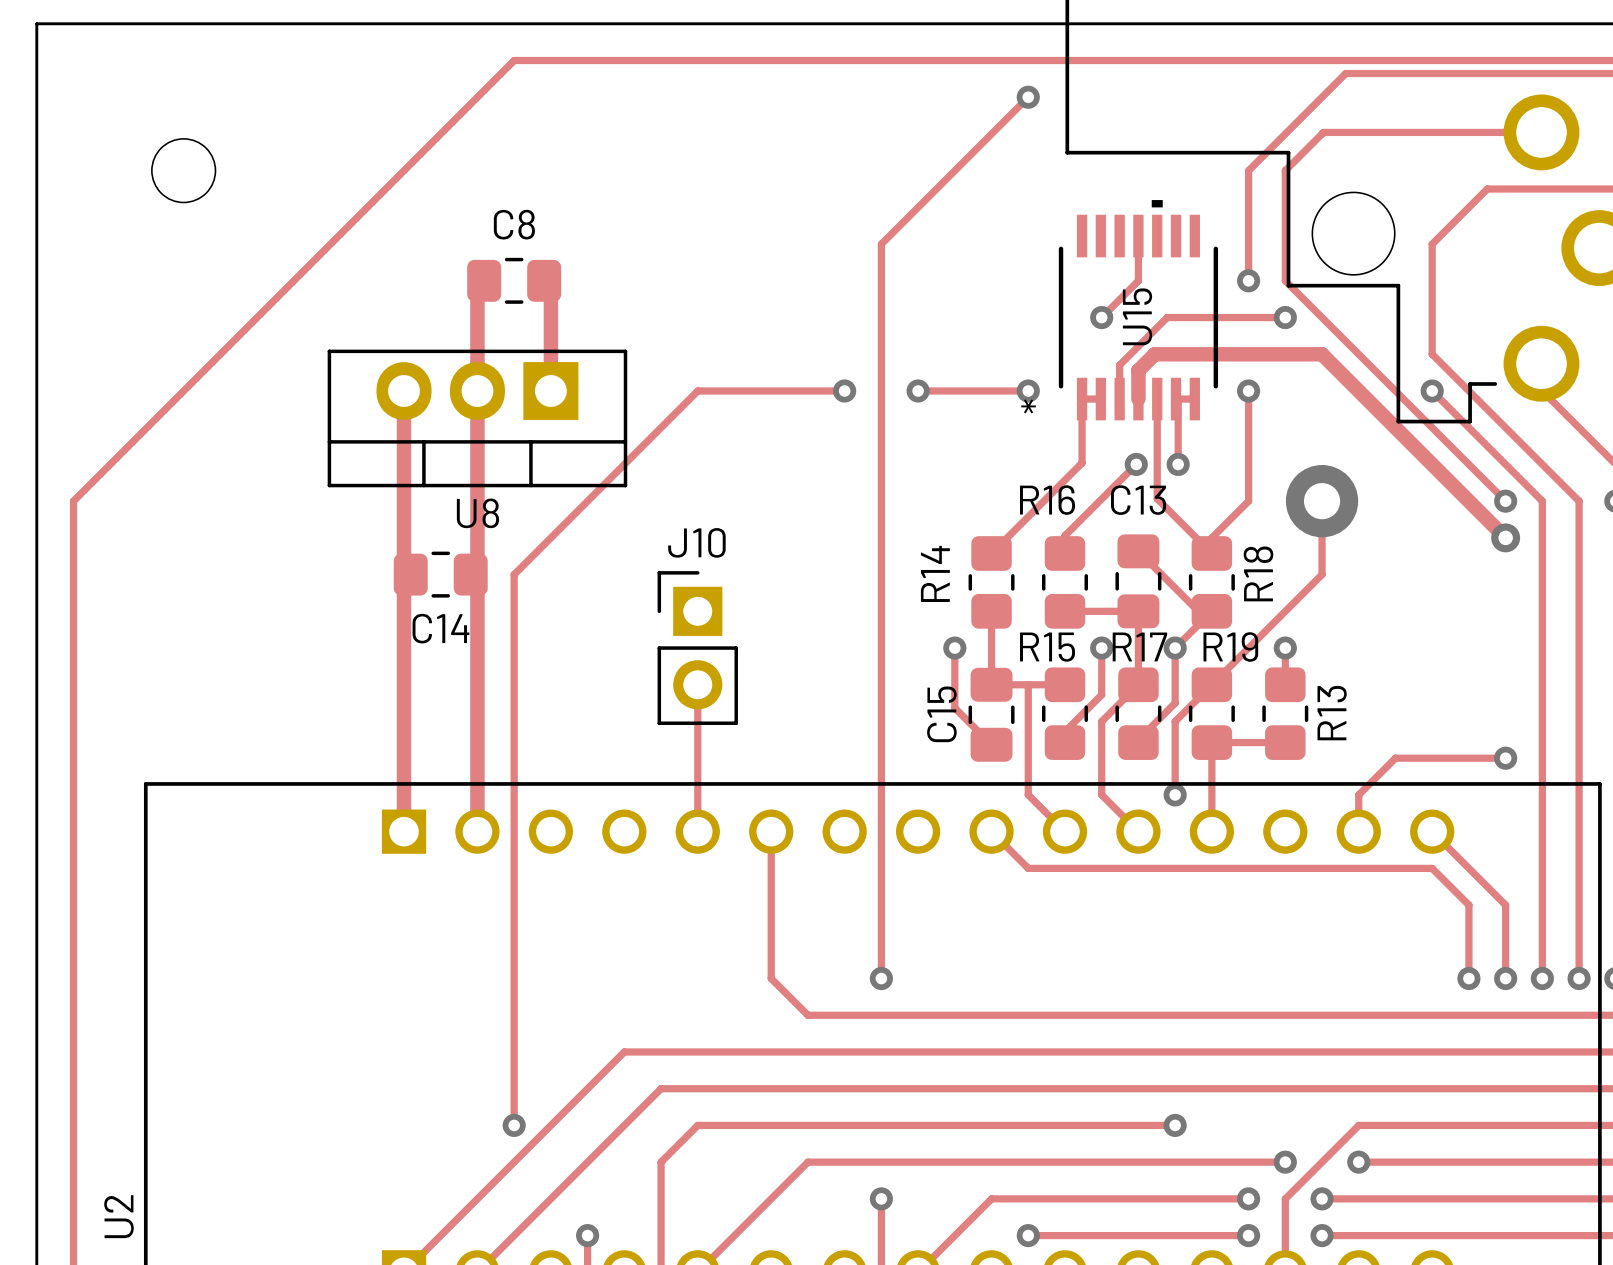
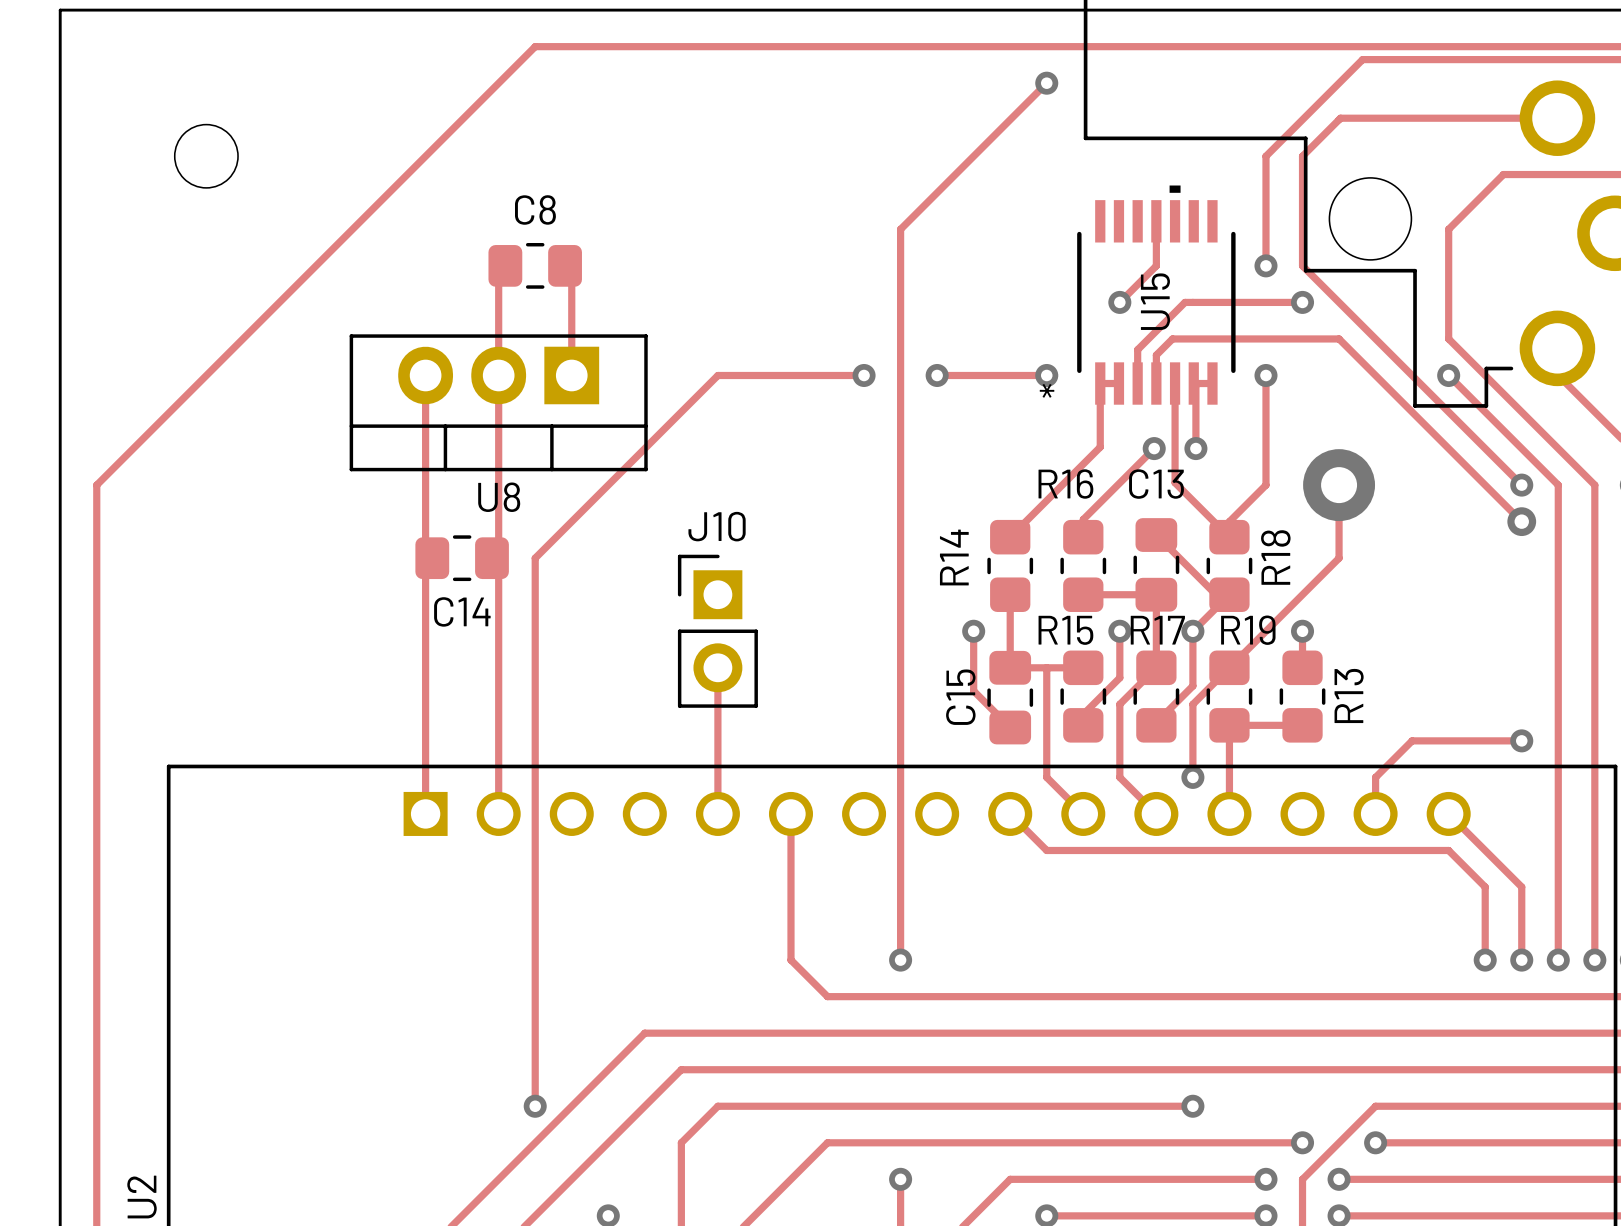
track width: thick (477, 287) (477, 567) -> thin (498, 272) (498, 551)
track width: thick (550, 287) (550, 391) -> thin (571, 272) (571, 375)
track width: thick (404, 391) (404, 567) -> thin (425, 375) (425, 551)
track width: thick (1138, 399) (1138, 370) (1154, 354) (1322, 354) (1505, 537) -> thin (1156, 383) (1156, 355) (1172, 338) (1339, 338) (1521, 521)
track width: thick (404, 581) (404, 831) -> thin (425, 564) (425, 813)
track width: thick (477, 581) (477, 831) -> thin (498, 564) (498, 813)

